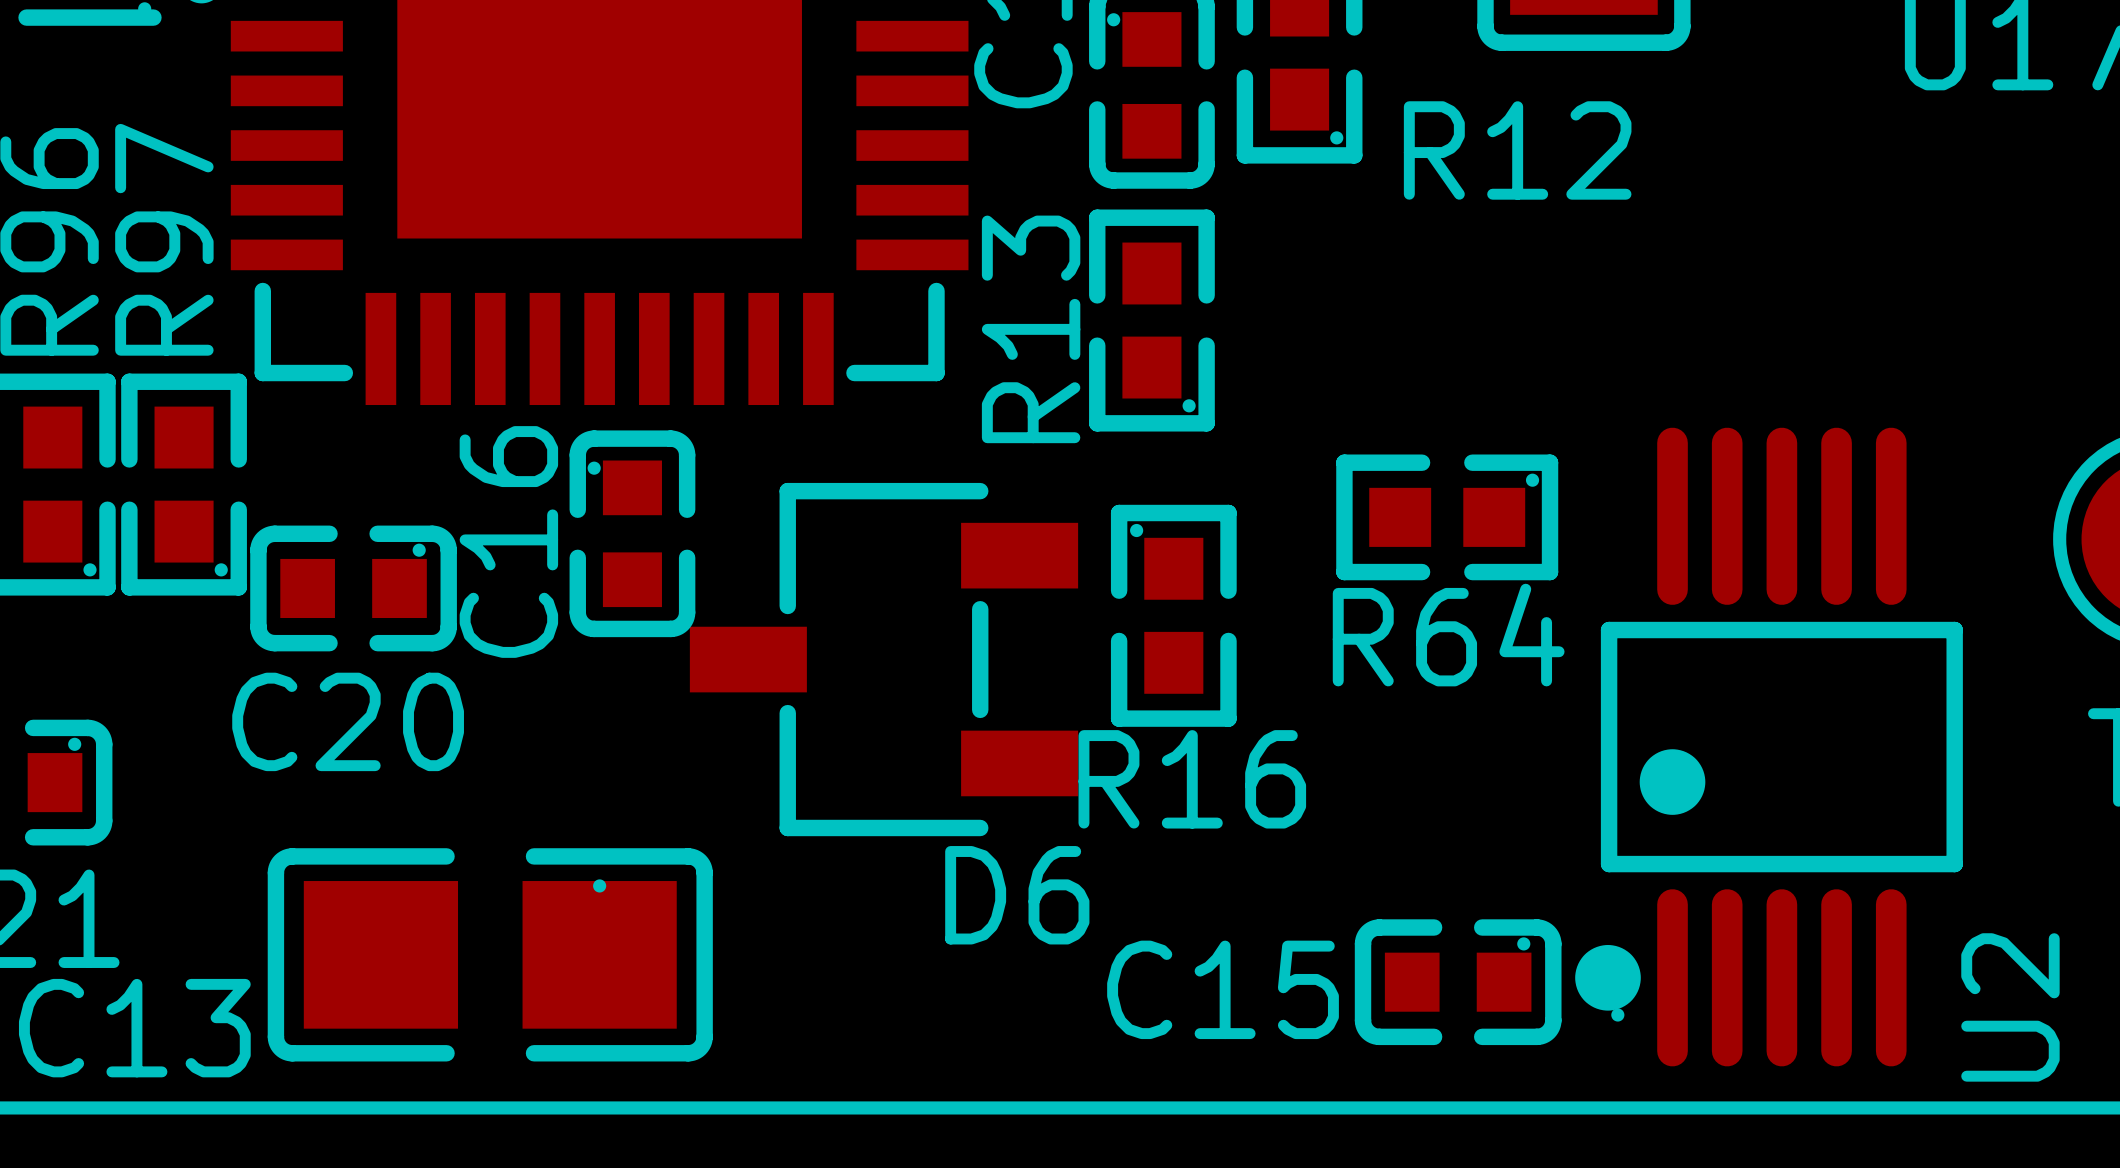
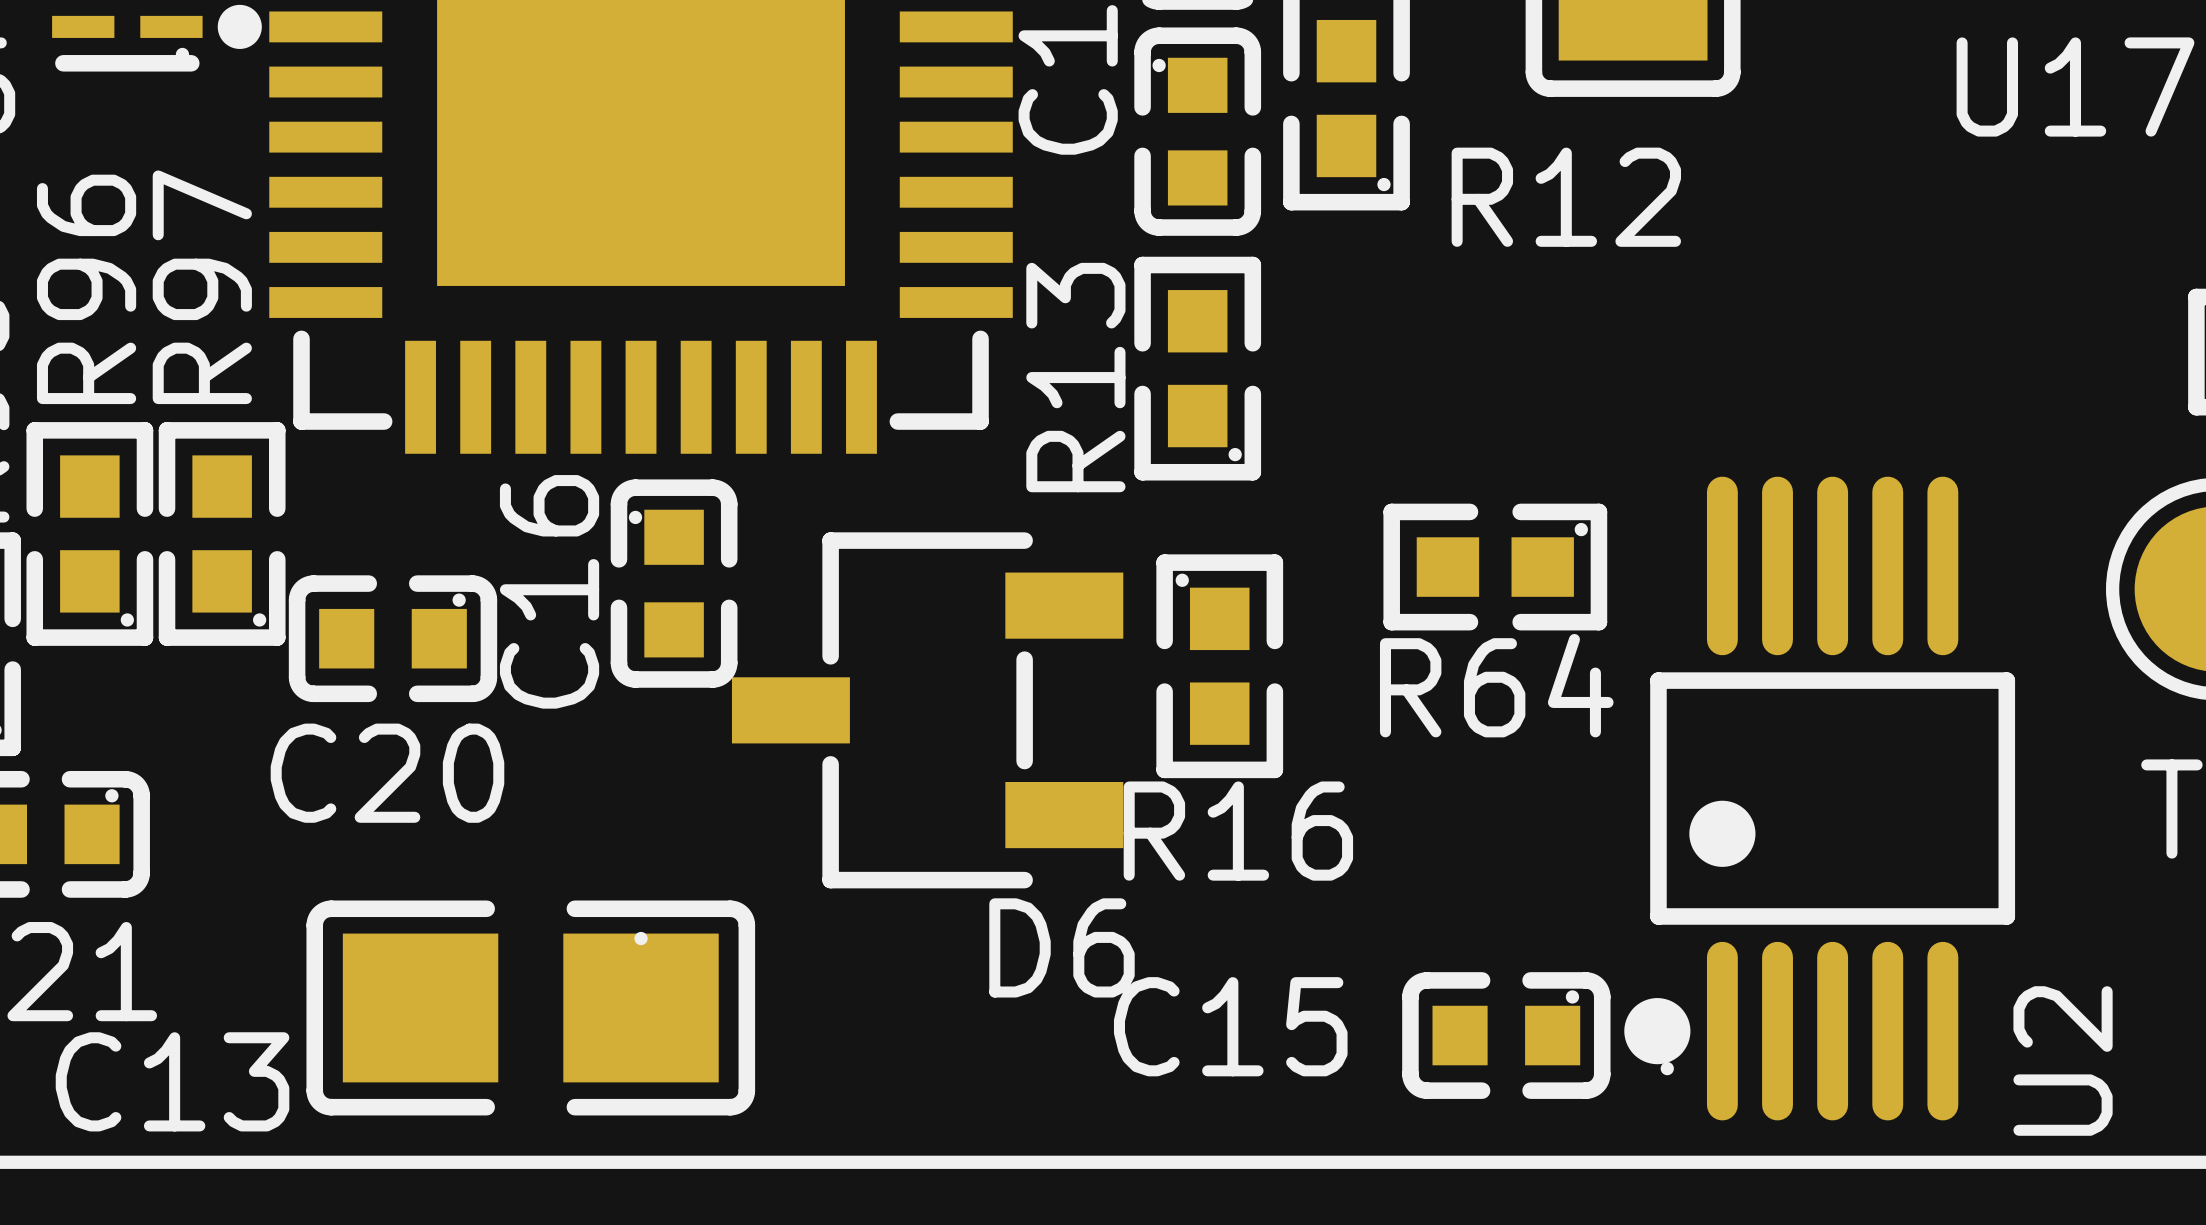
C15 name position: C15 (1223, 989) -> C15 (1230, 1026)

